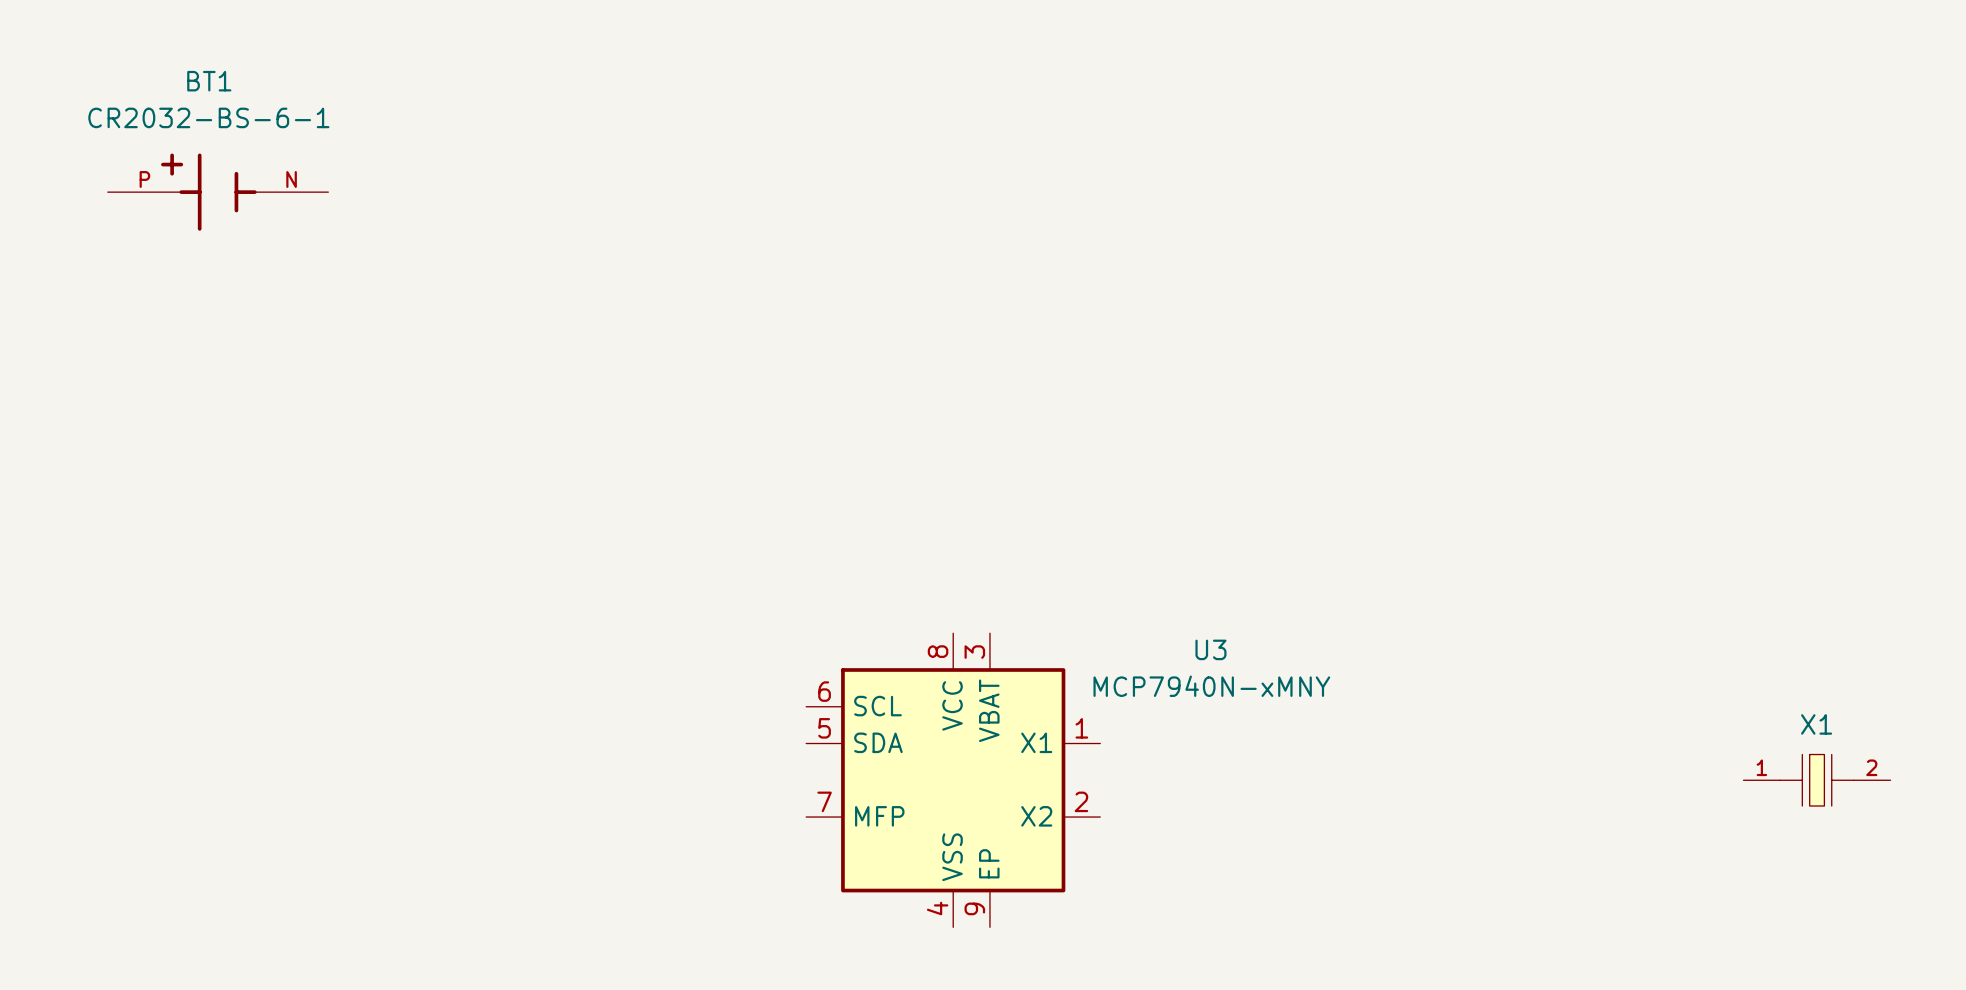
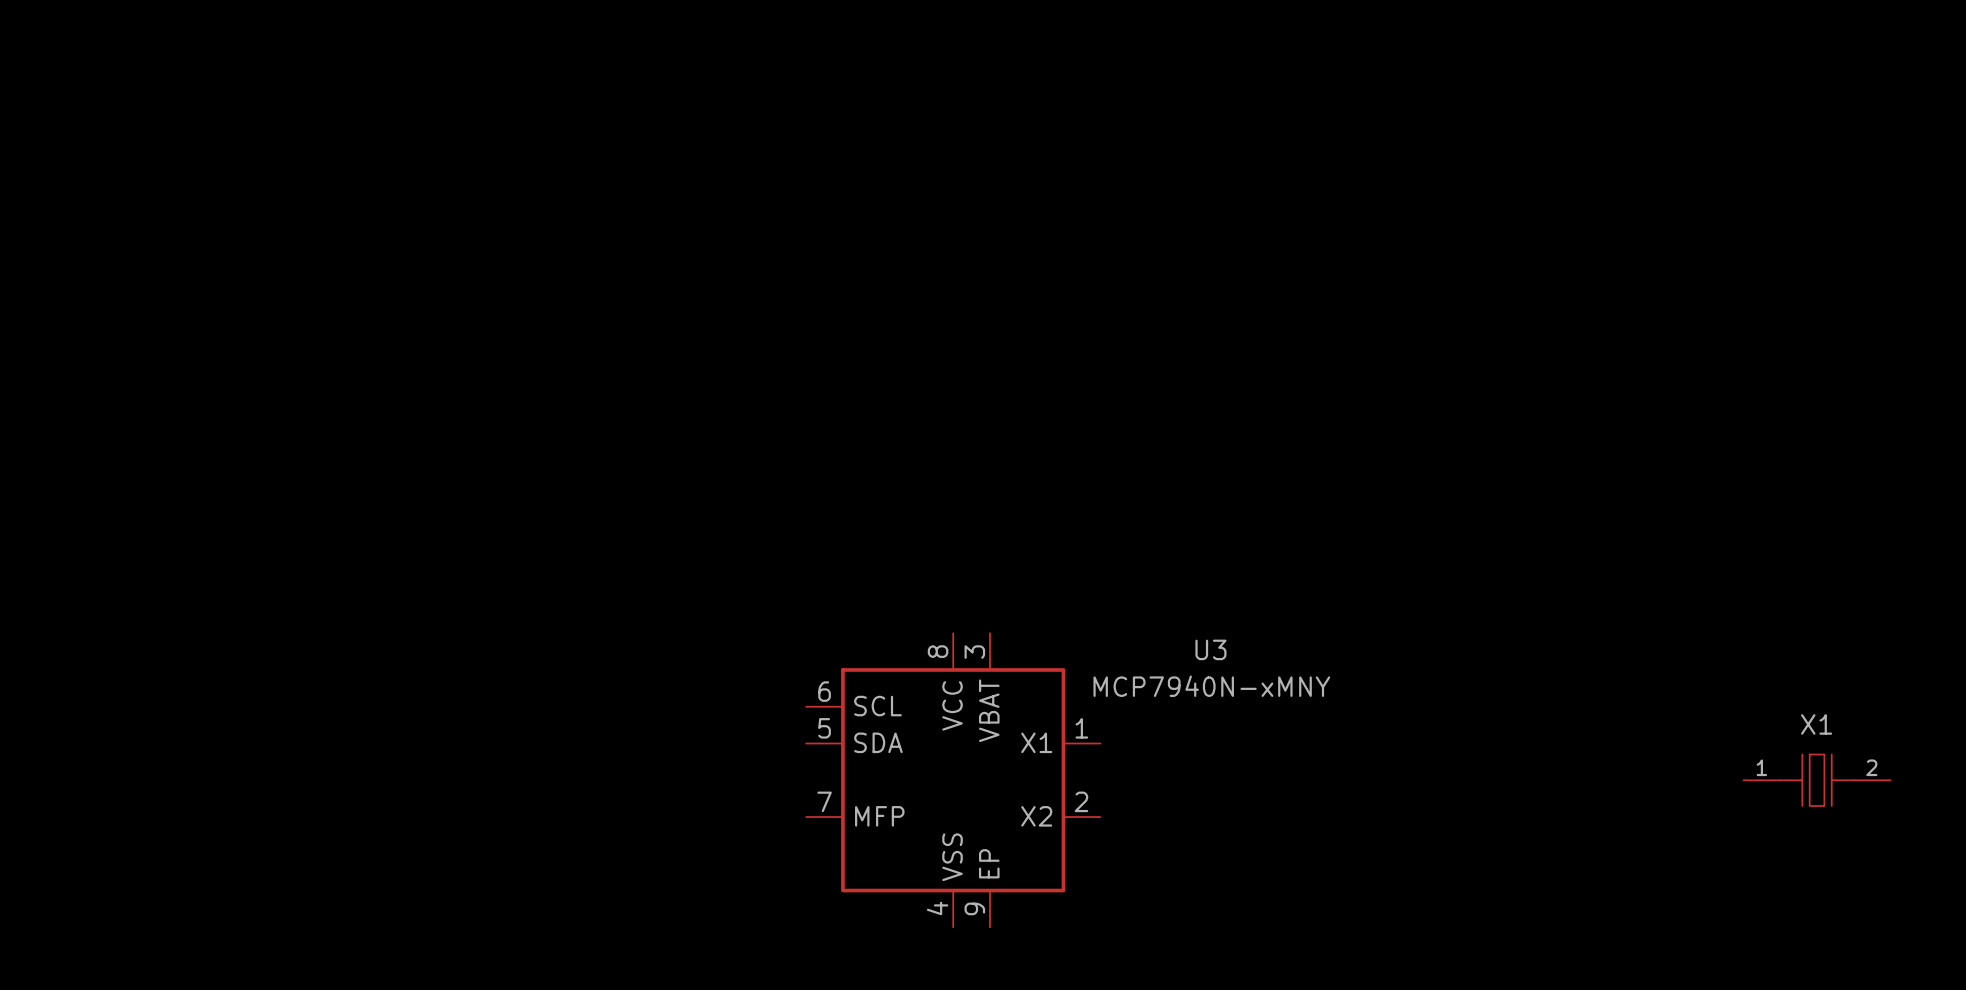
BT1: CR2032-BS-6-1 (218, 192) -> none

